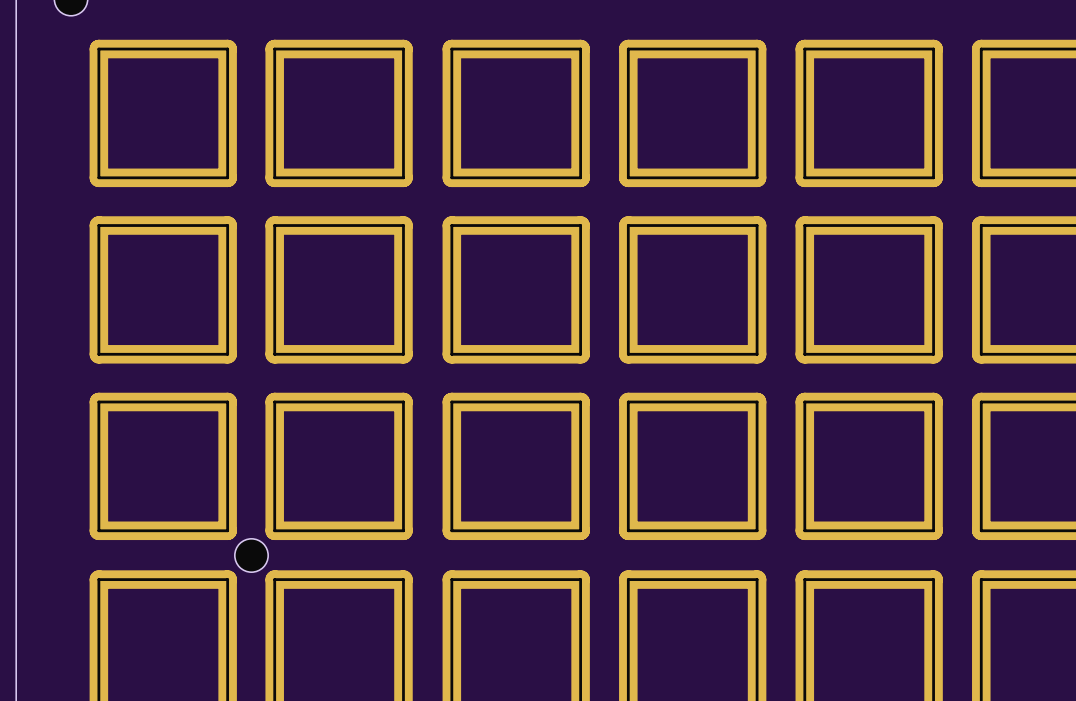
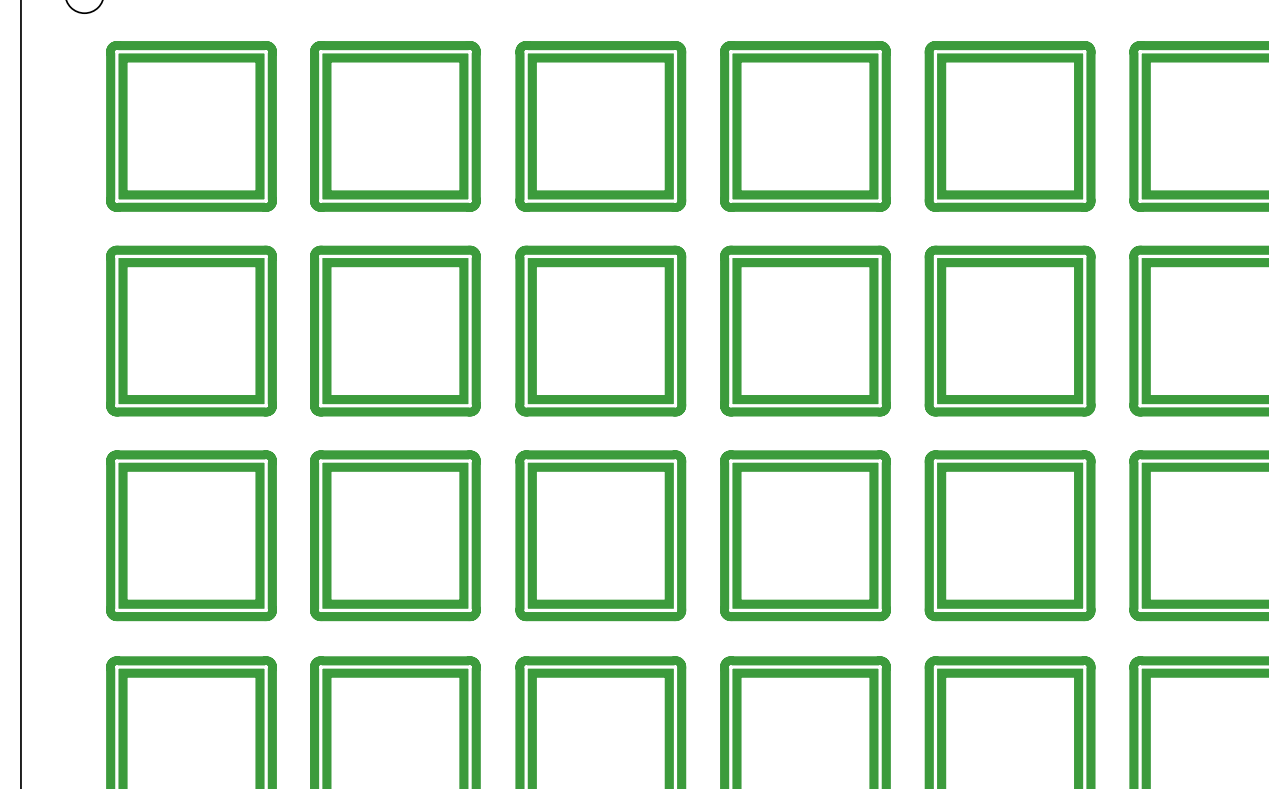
part: (251, 555) -> none

